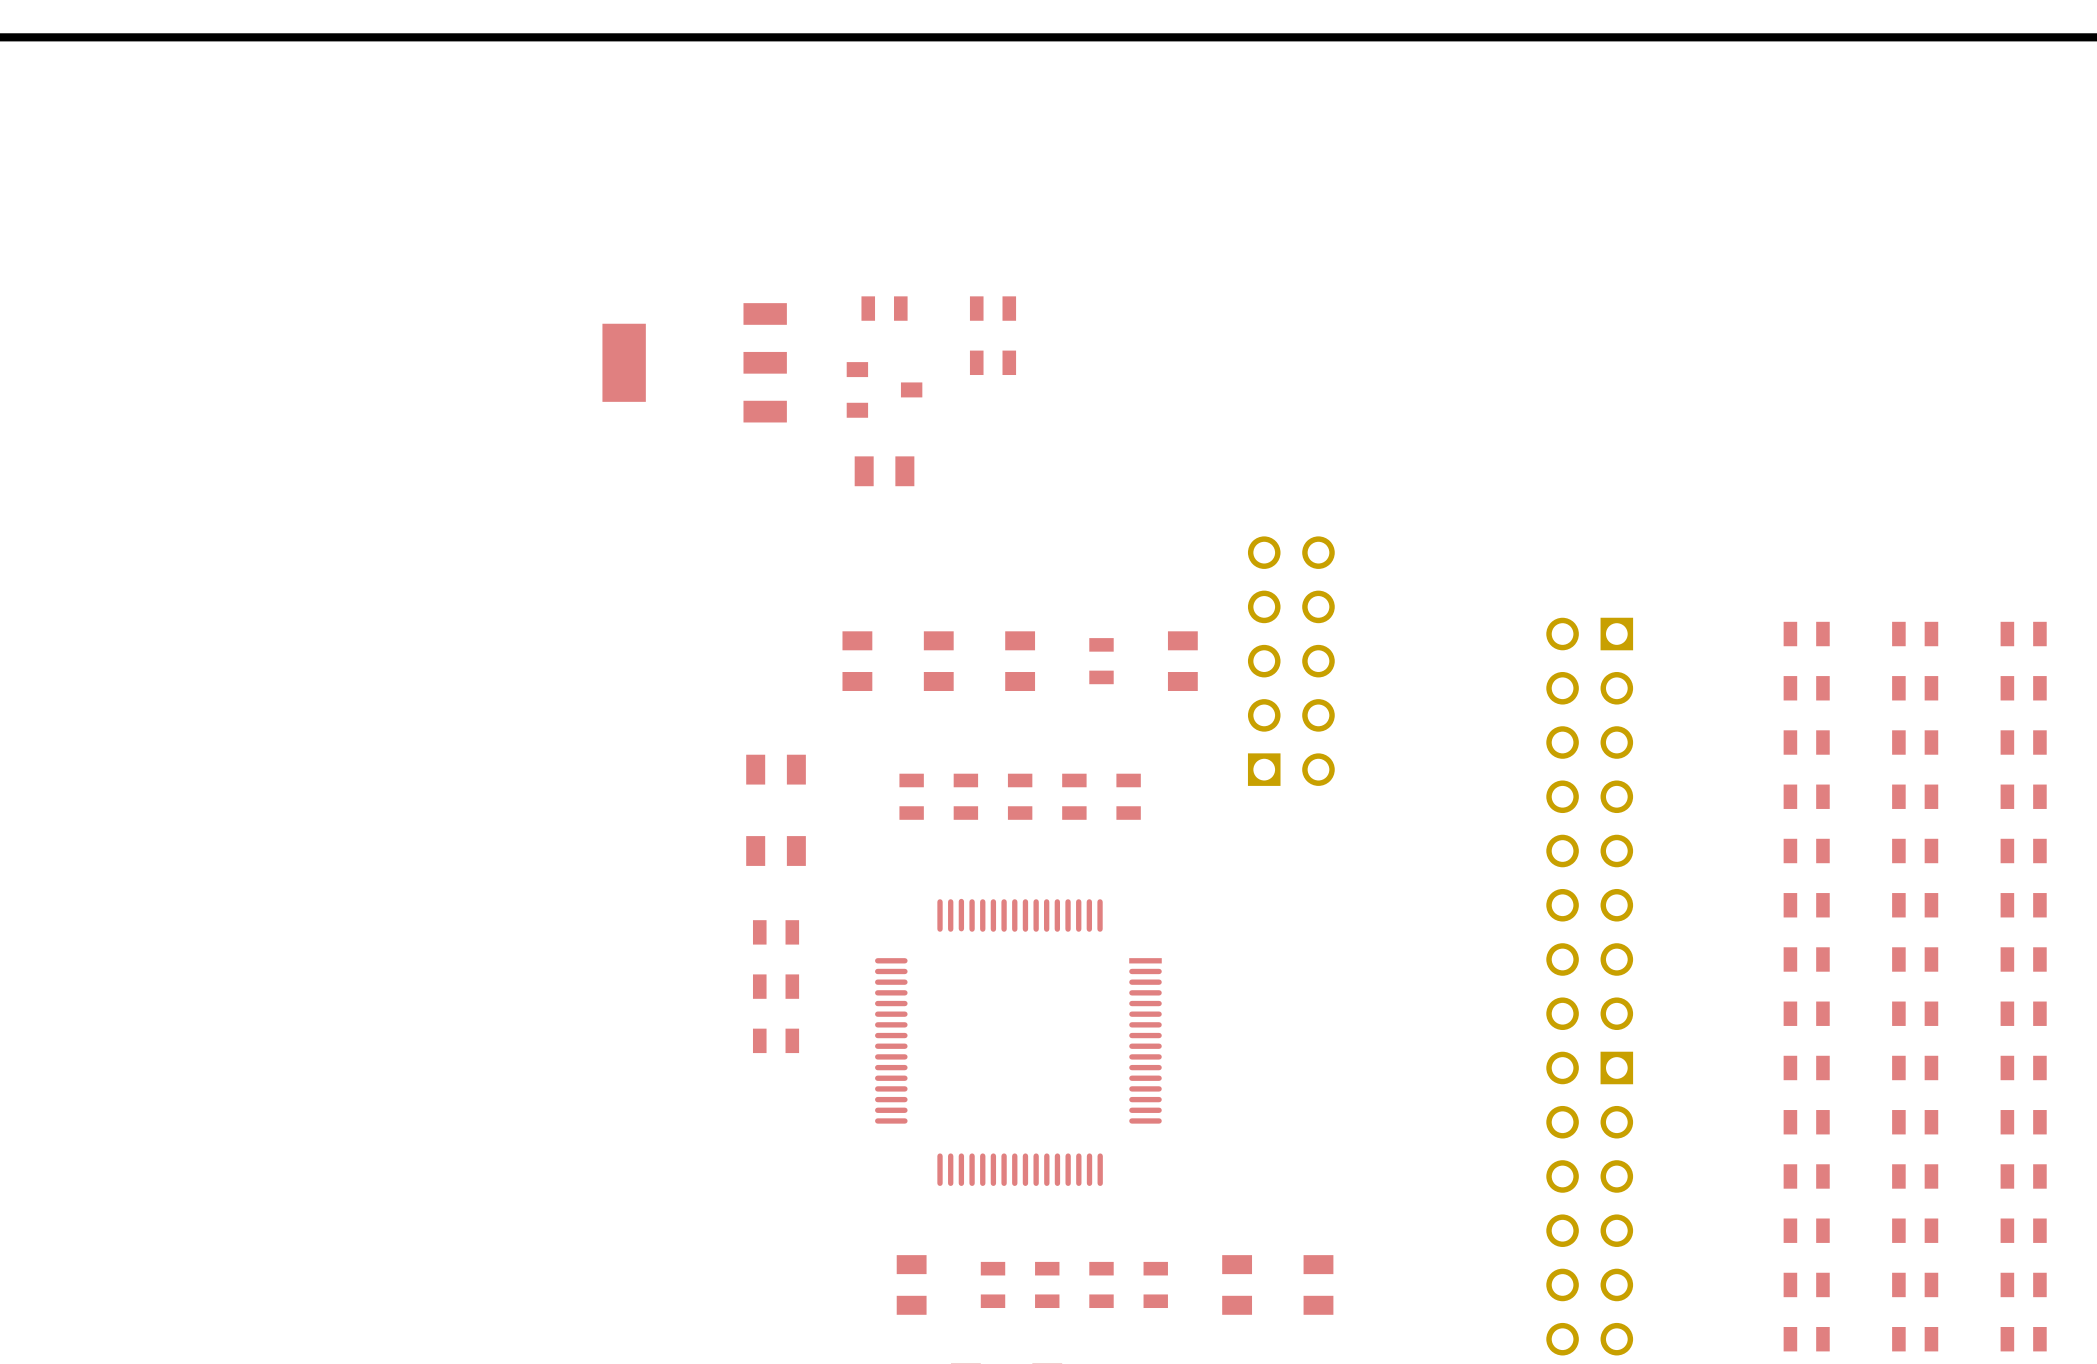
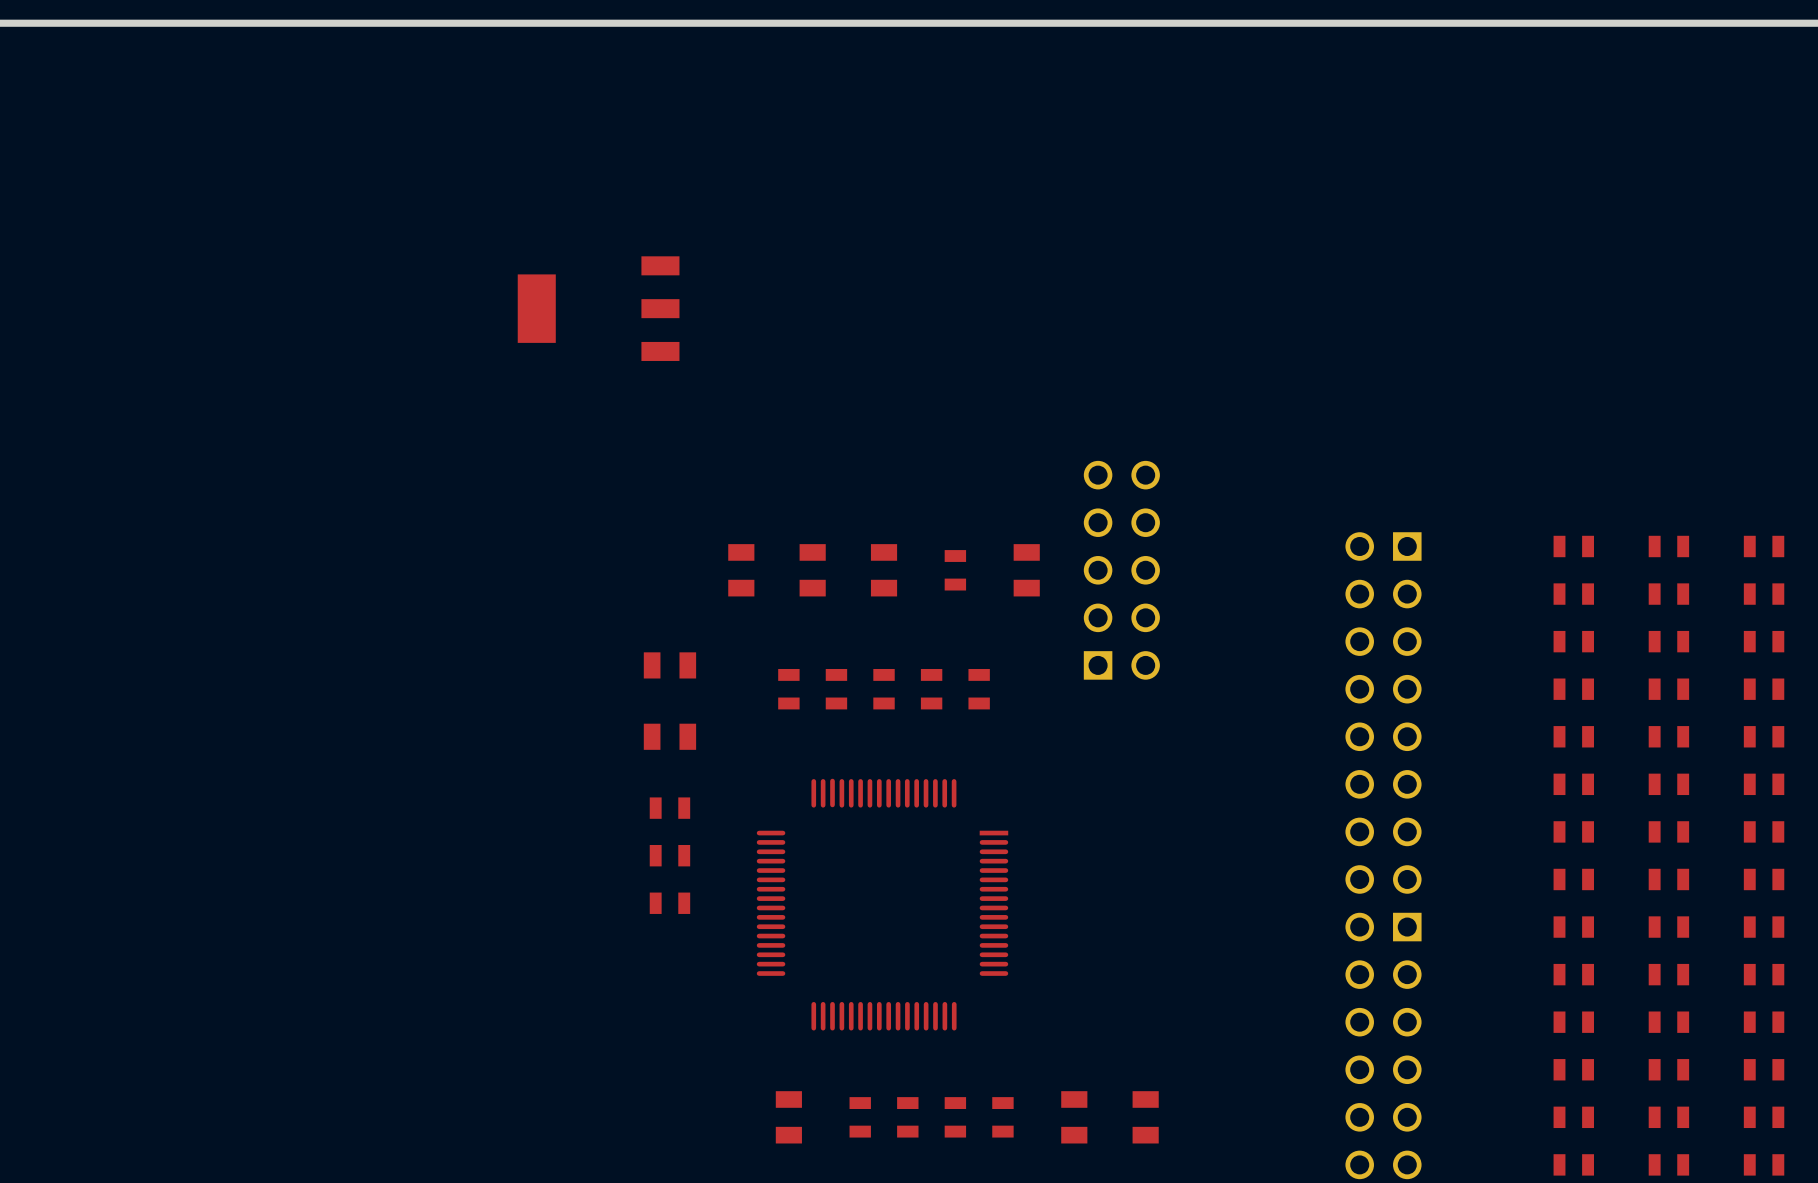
part: (884, 308) -> none
part: (993, 308) -> none
part: (993, 362) -> none
part: (884, 389) -> none
part: (884, 471) -> none

